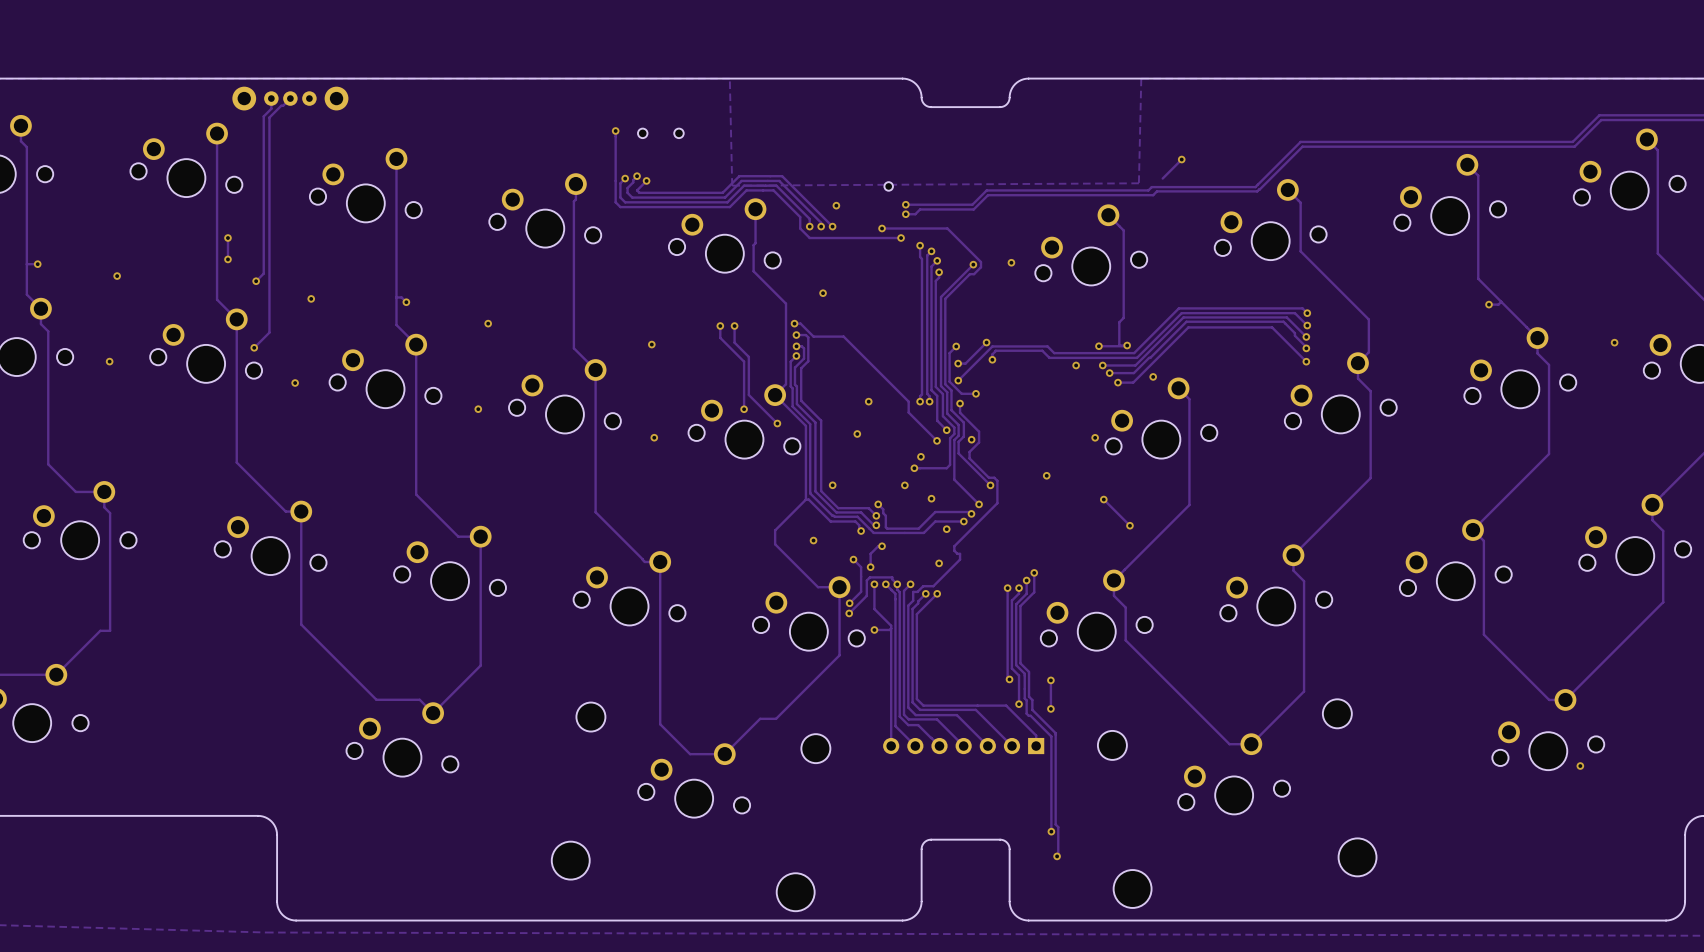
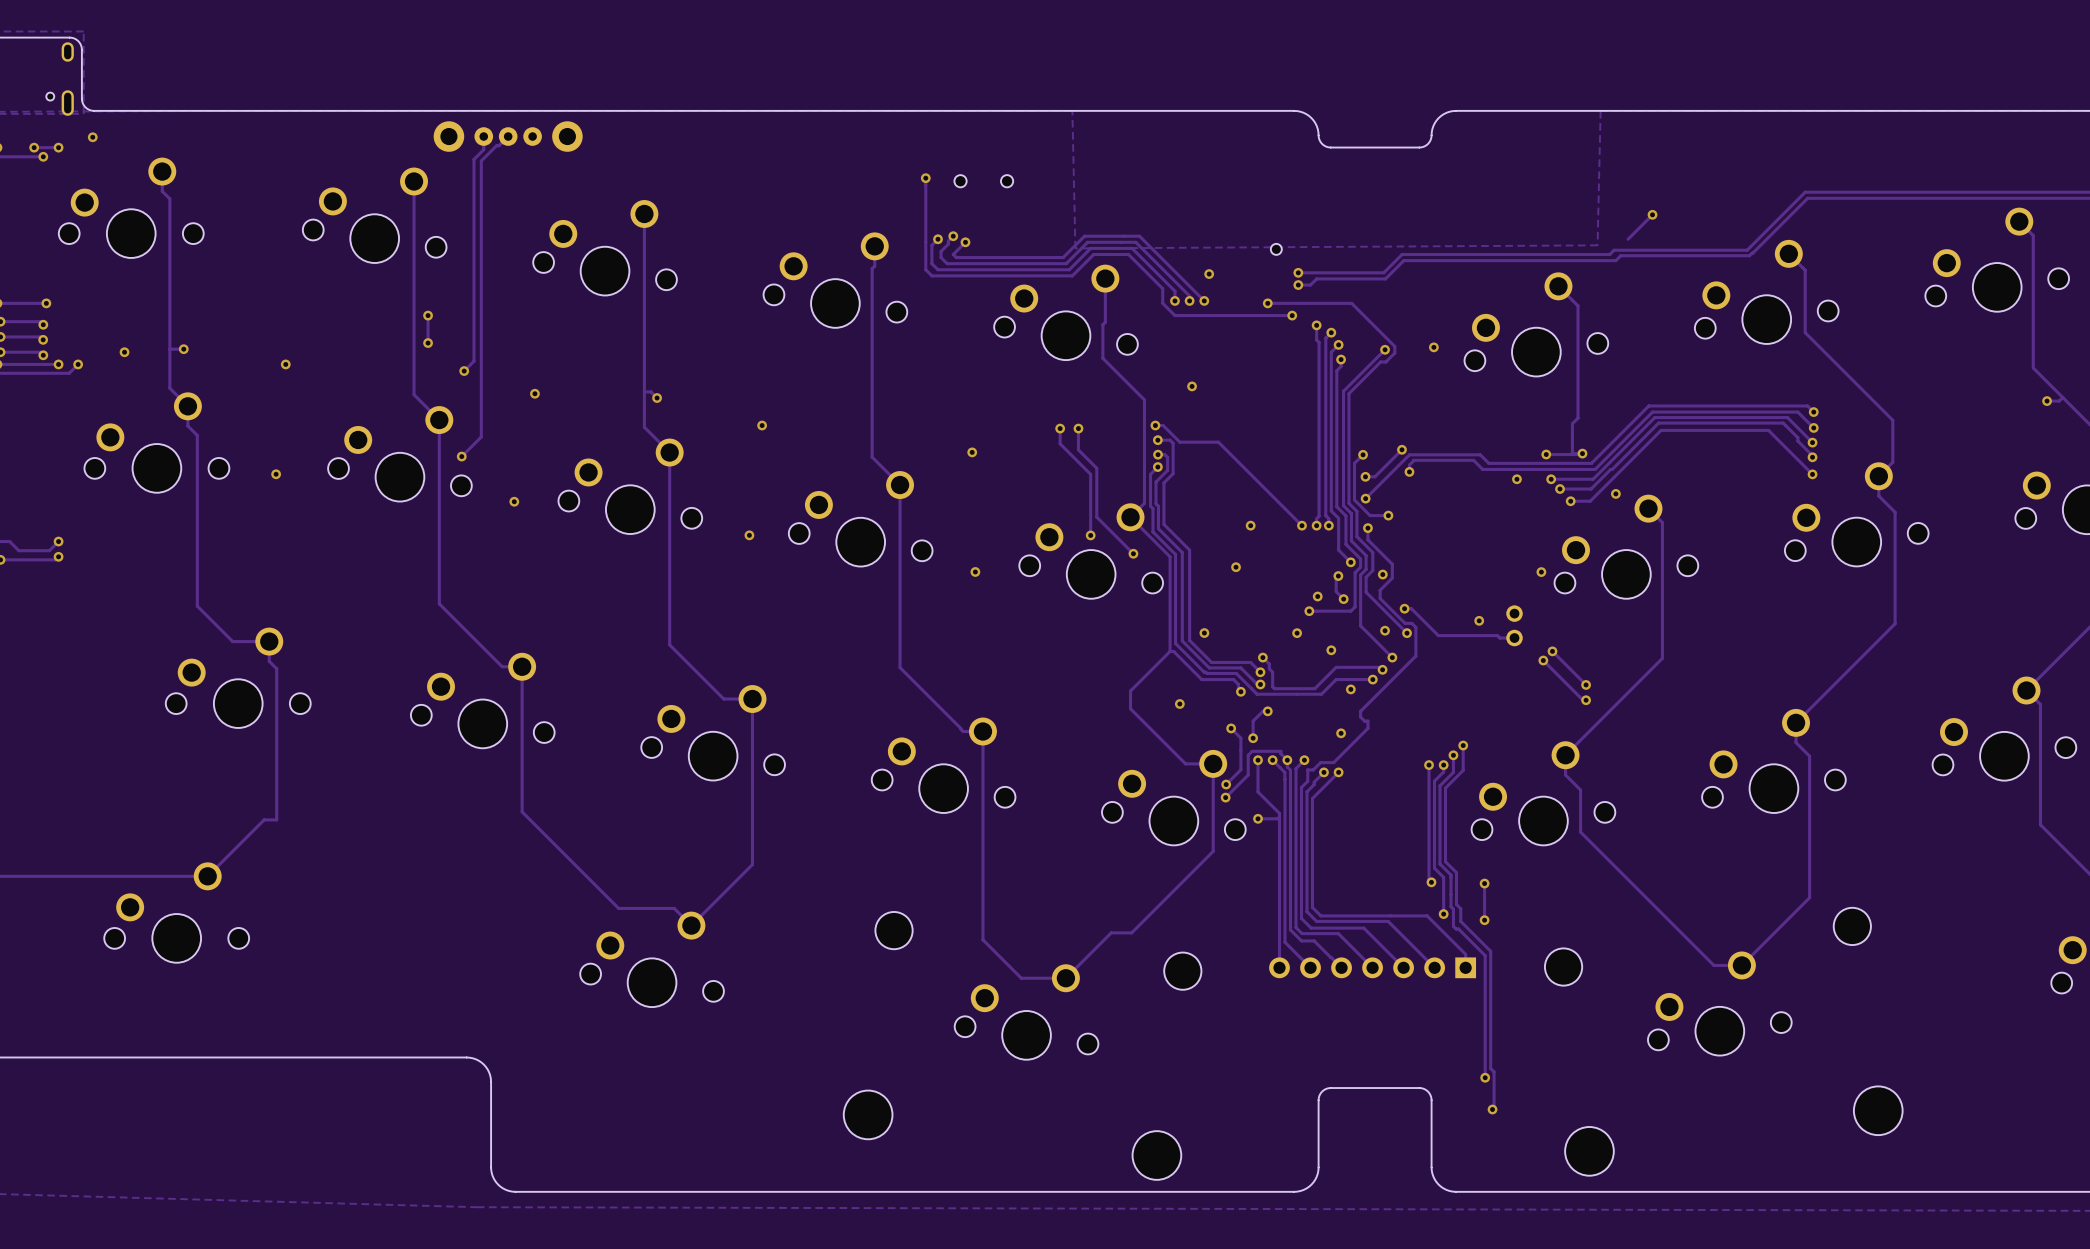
track: (908, 401) (908, 412) (937, 440) -> none
via: none -> (1301, 525)
track: none -> (1336, 579) (1336, 591) (1343, 599)
via: none -> (1343, 599)
track: none -> (1404, 608) (1411, 608) (1438, 635) (1497, 635) (1499, 638) (1514, 638)
via: none -> (1404, 608)
part: none -> (1514, 625)
via: none -> (1385, 630)
track: none -> (1543, 660) (1583, 700) (1586, 700)
via: none -> (1543, 660)
via: none -> (1586, 700)

